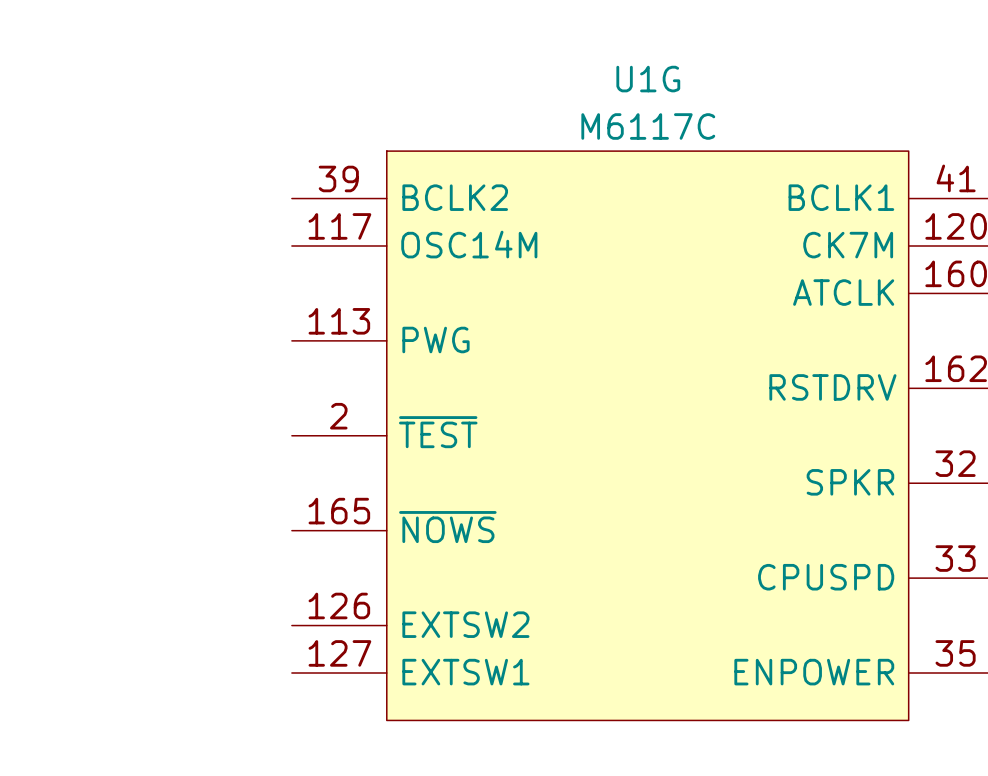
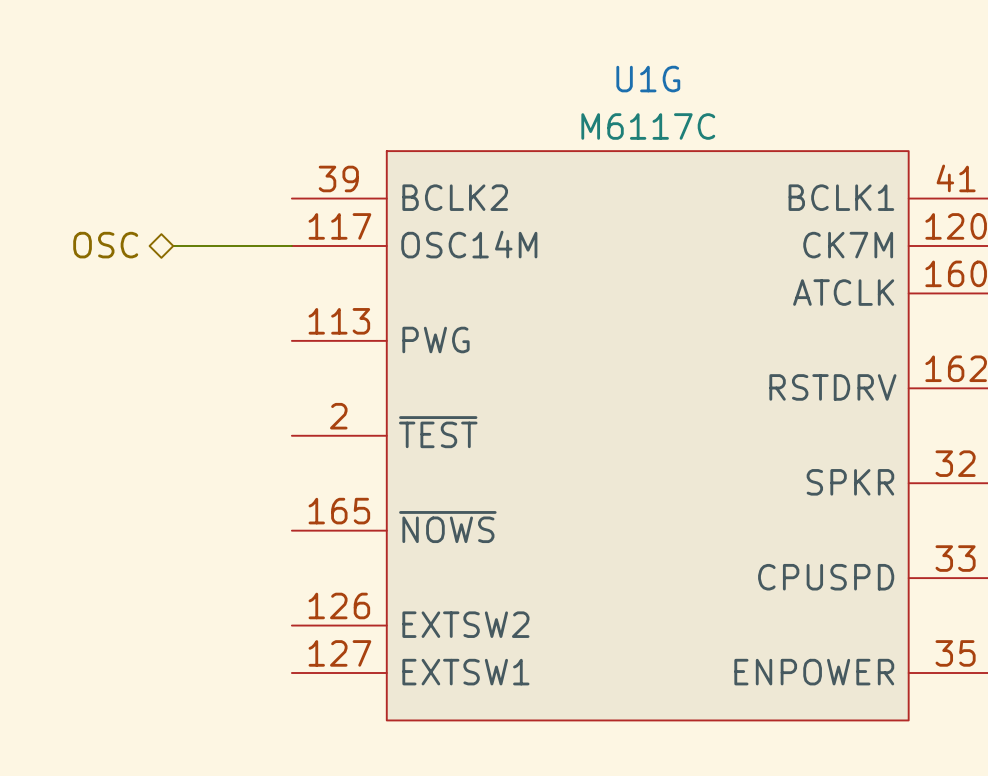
hierarchical label: none -> OSC (105, 245)
wire: none -> (173, 245) (291, 245)

